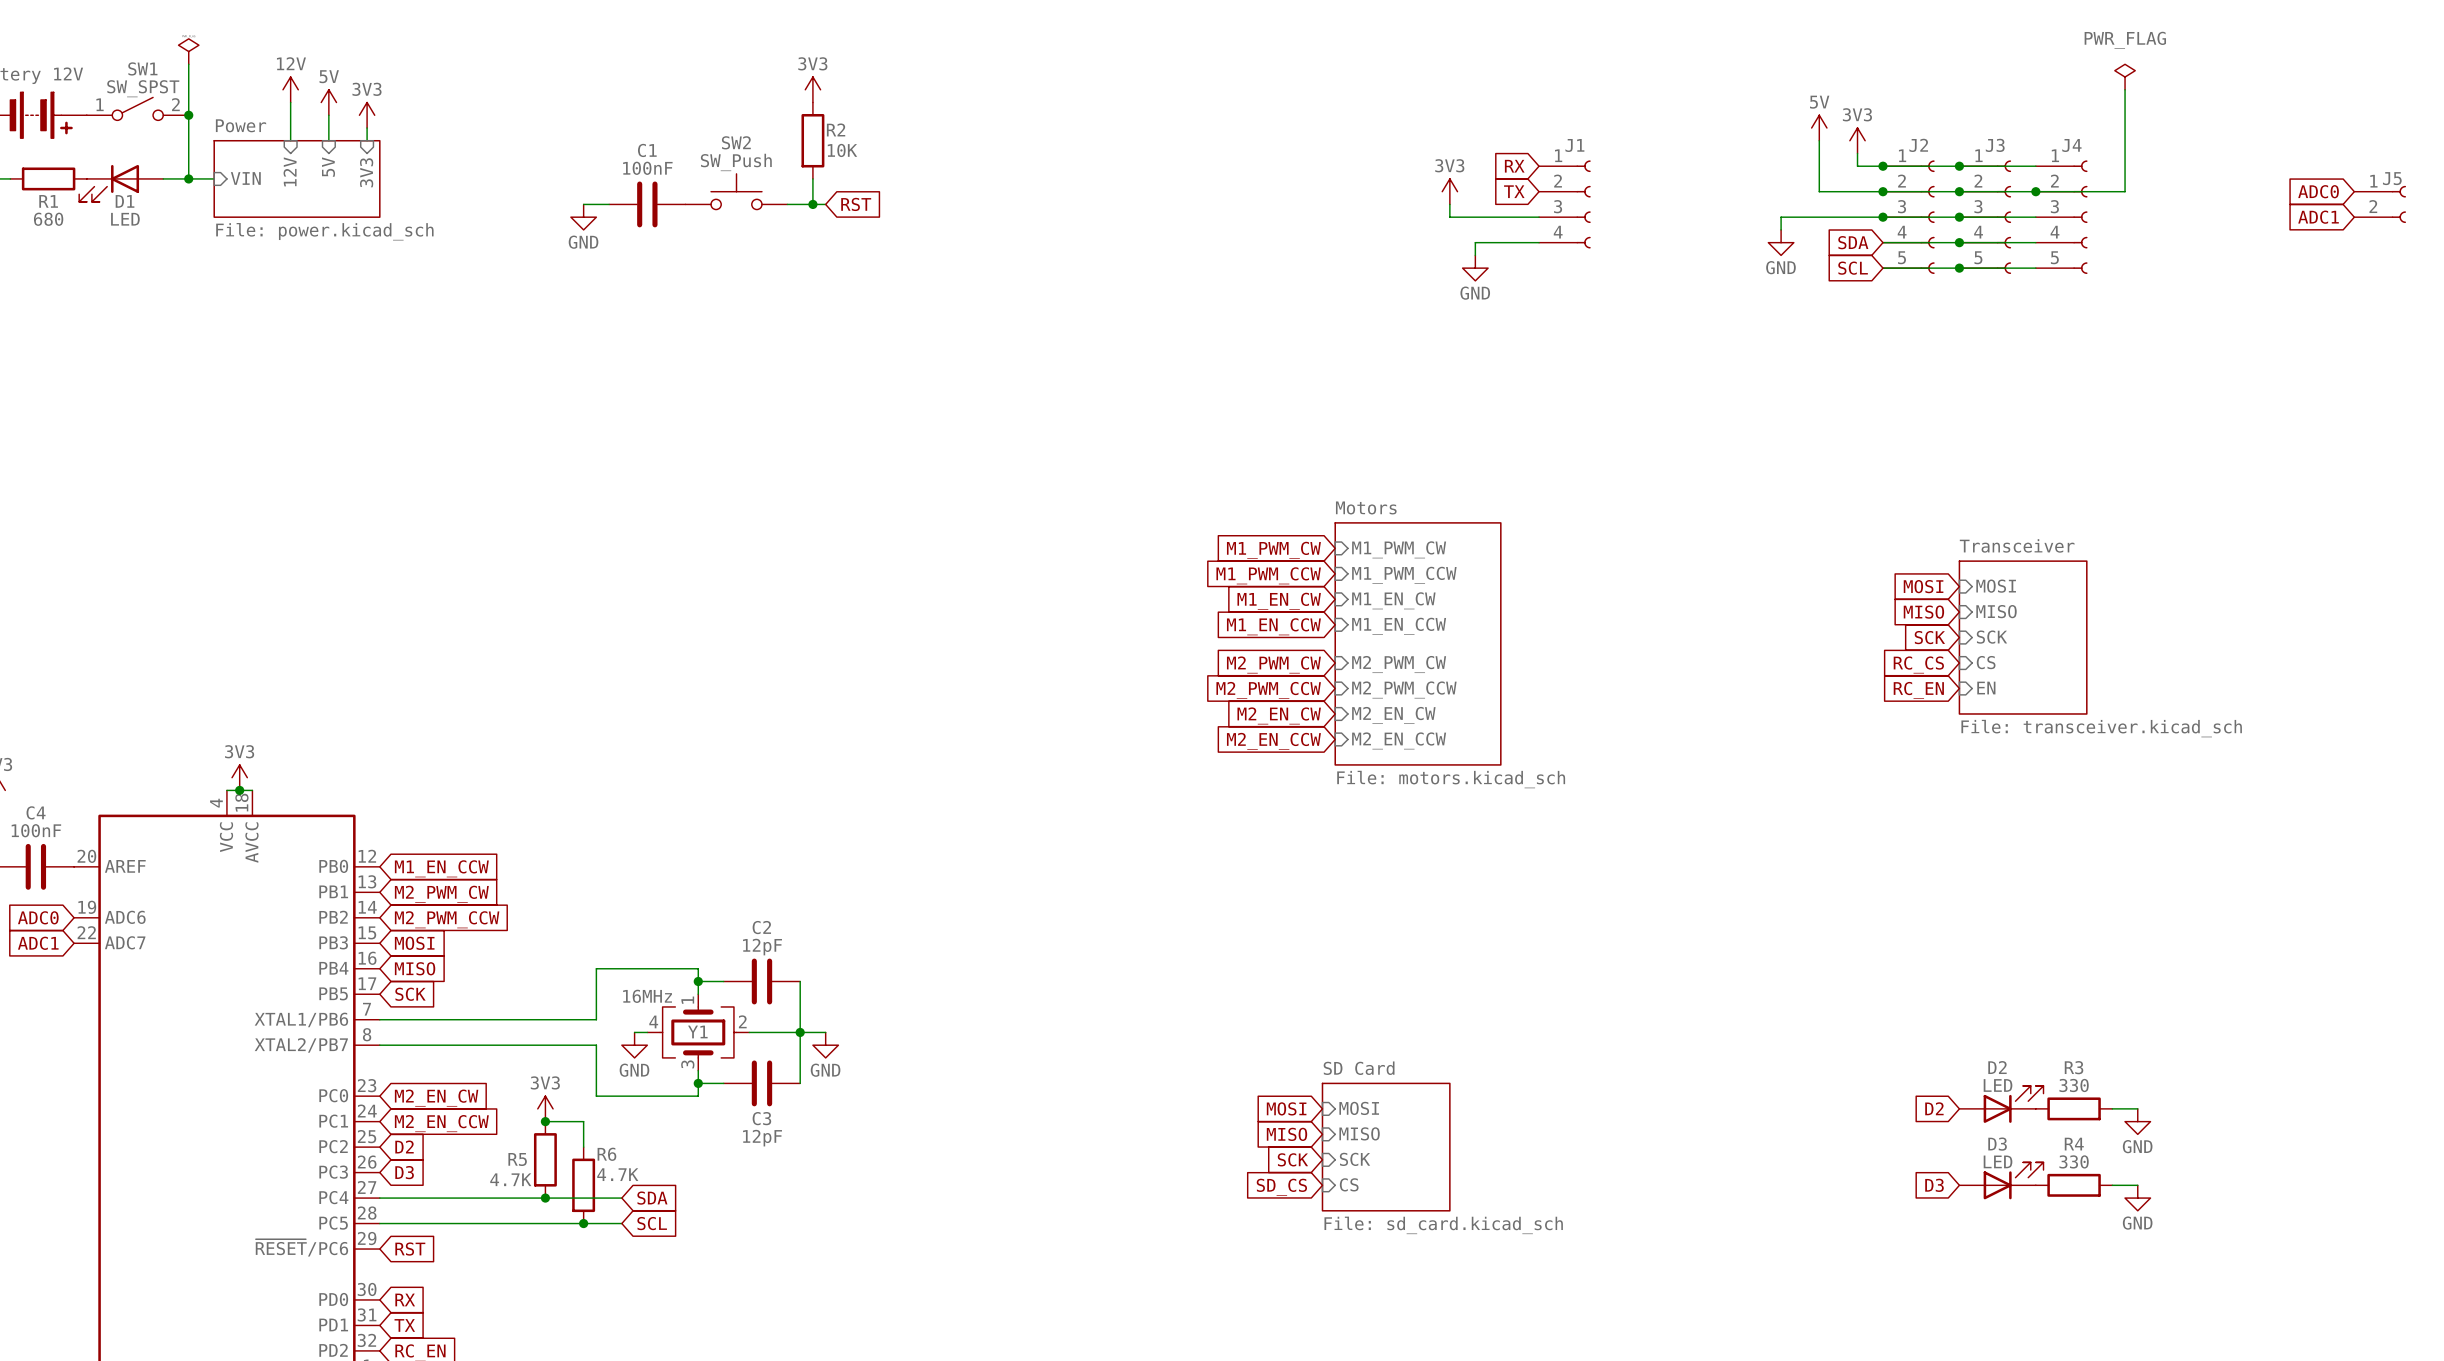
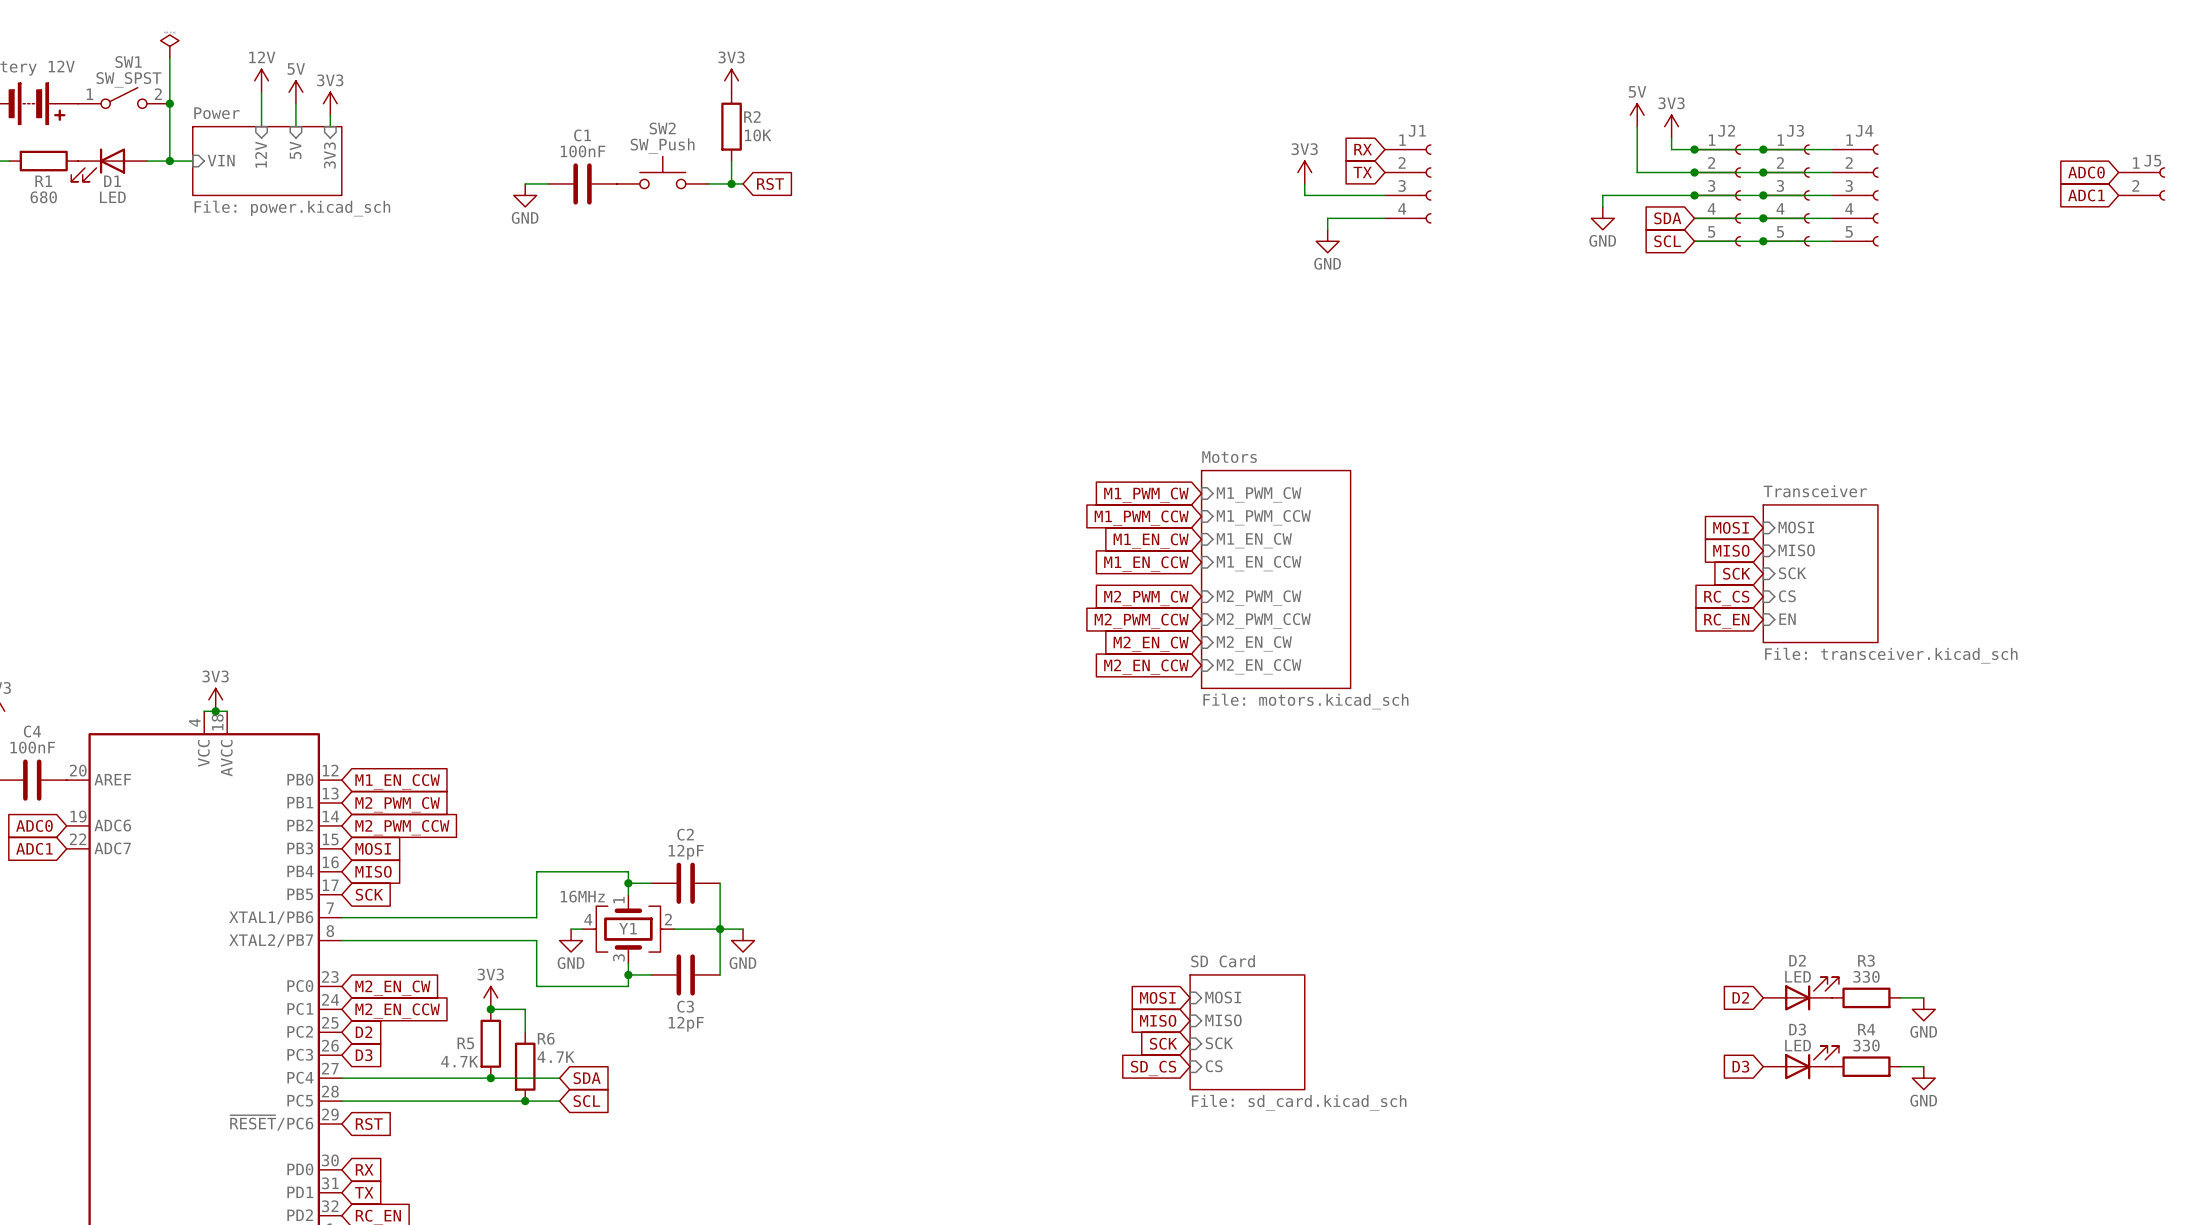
power symbol: PWR_FLAG (2125, 77) -> none
wire: (2125, 89) (2125, 191) (2035, 191) -> none
junction: (2035, 191) -> none

